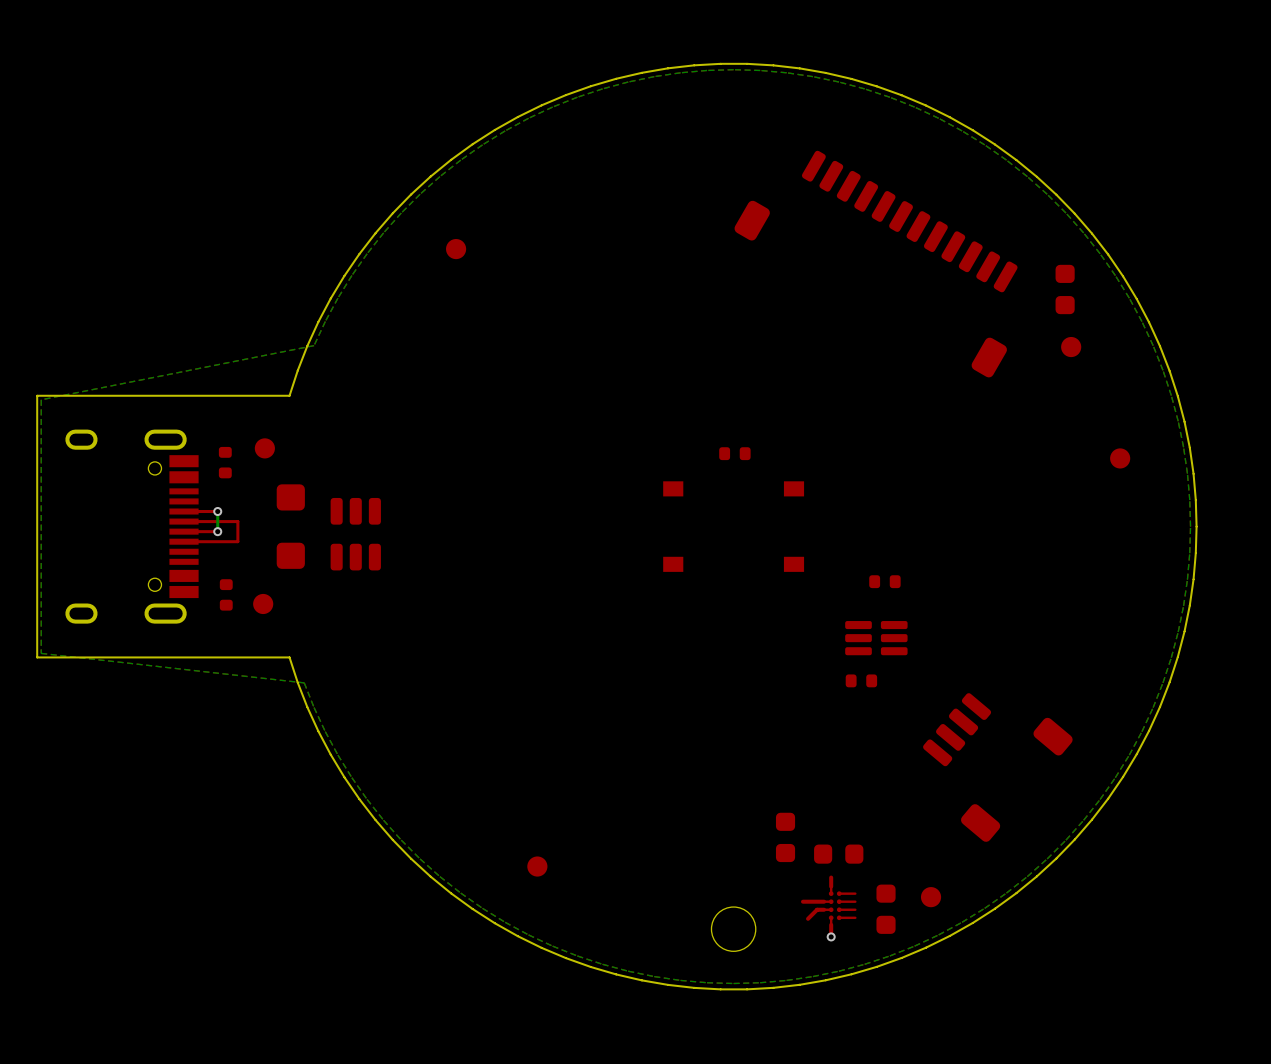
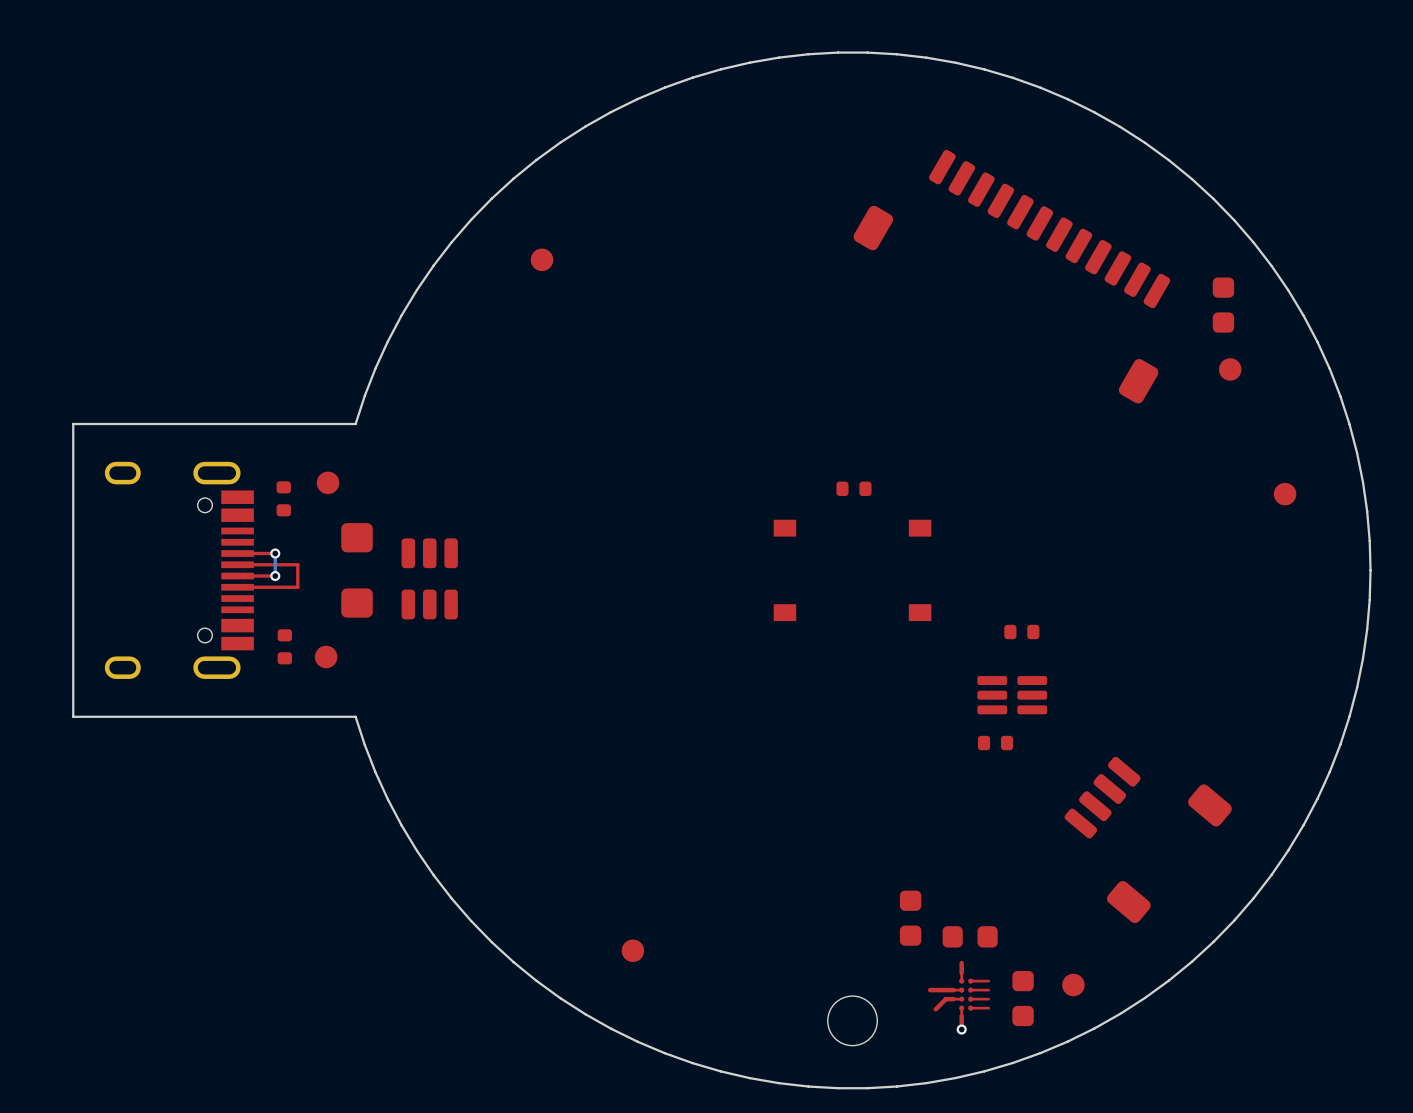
bottom zone outline: (733, 69) (760, 70) (812, 76) (838, 82) (889, 97) (914, 107) (962, 130) (1006, 160) (1047, 194) (1065, 213) (1100, 253) (1129, 298) (1153, 345) (1162, 370) (1178, 421) (1187, 473) (1190, 526) (1189, 553) (1183, 605) (1178, 631) (1162, 682) (1153, 707) (1129, 755) (1100, 799) (1065, 840) (1047, 858) (1006, 893) (962, 922) (914, 946) (889, 955) (838, 971) (786, 980) (733, 983) (707, 982) (654, 976) (628, 971) (577, 955) (552, 946) (505, 922) (460, 893) (420, 858) (401, 840) (367, 799) (337, 755) (314, 707) (304, 682) (41, 653) (41, 399) (314, 345) (337, 298) (367, 253) (383, 232) (420, 194) (460, 160) (482, 144) (505, 130) (552, 107) (602, 88) (628, 82) (680, 72) (733, 69) -> none

